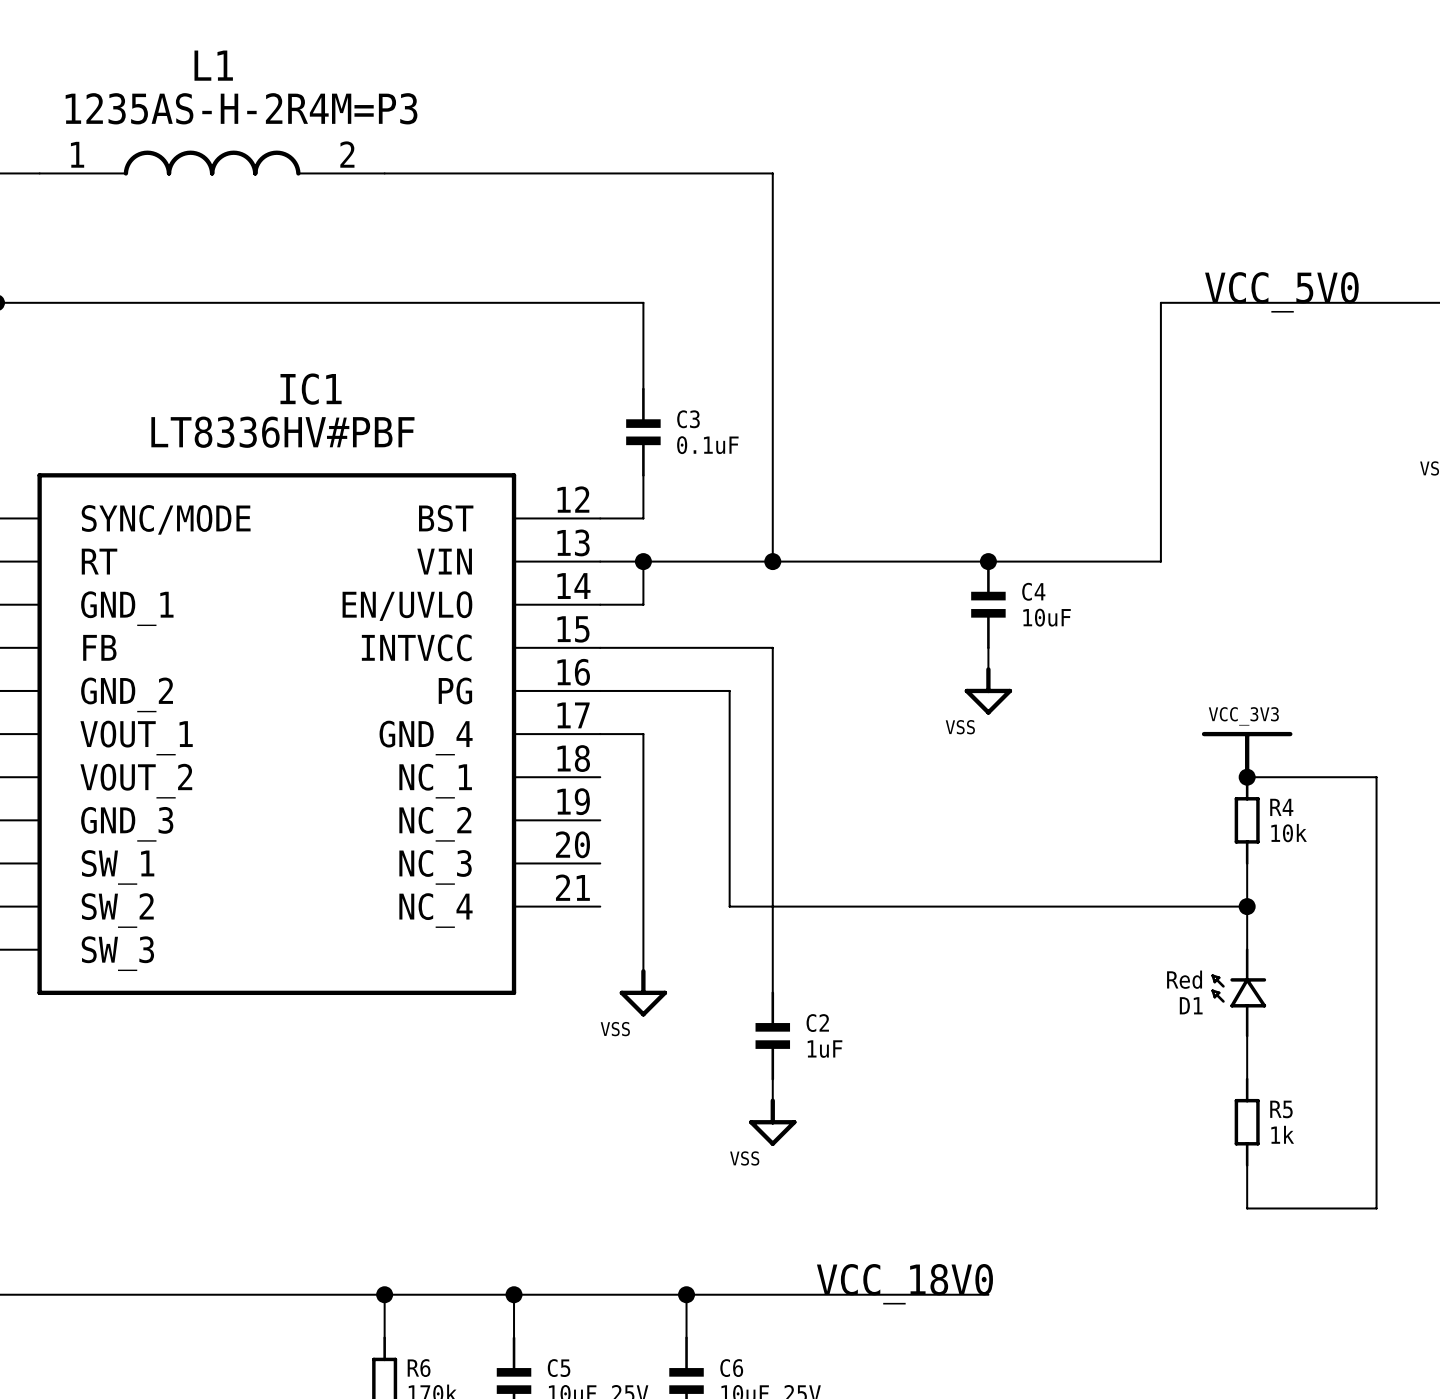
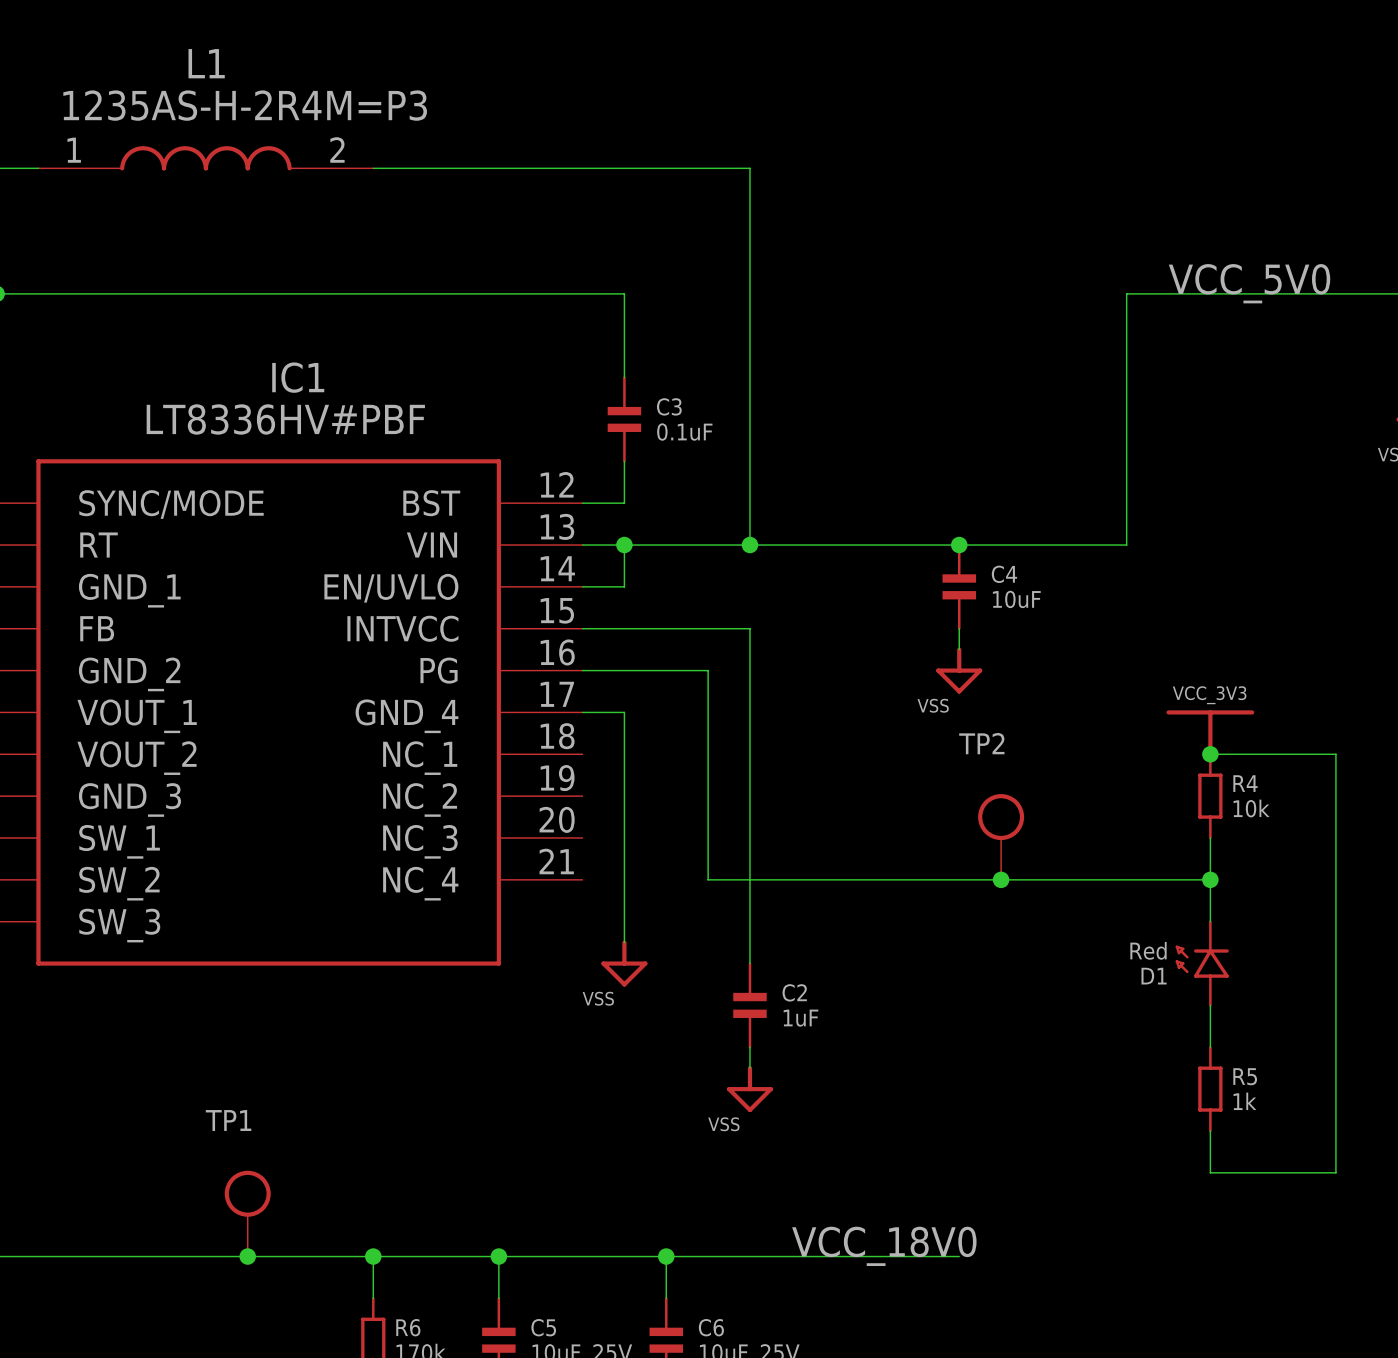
TP2: none -> (1001, 836)
junction: none -> (1001, 879)
TP1: none -> (247, 1213)
junction: none -> (247, 1256)

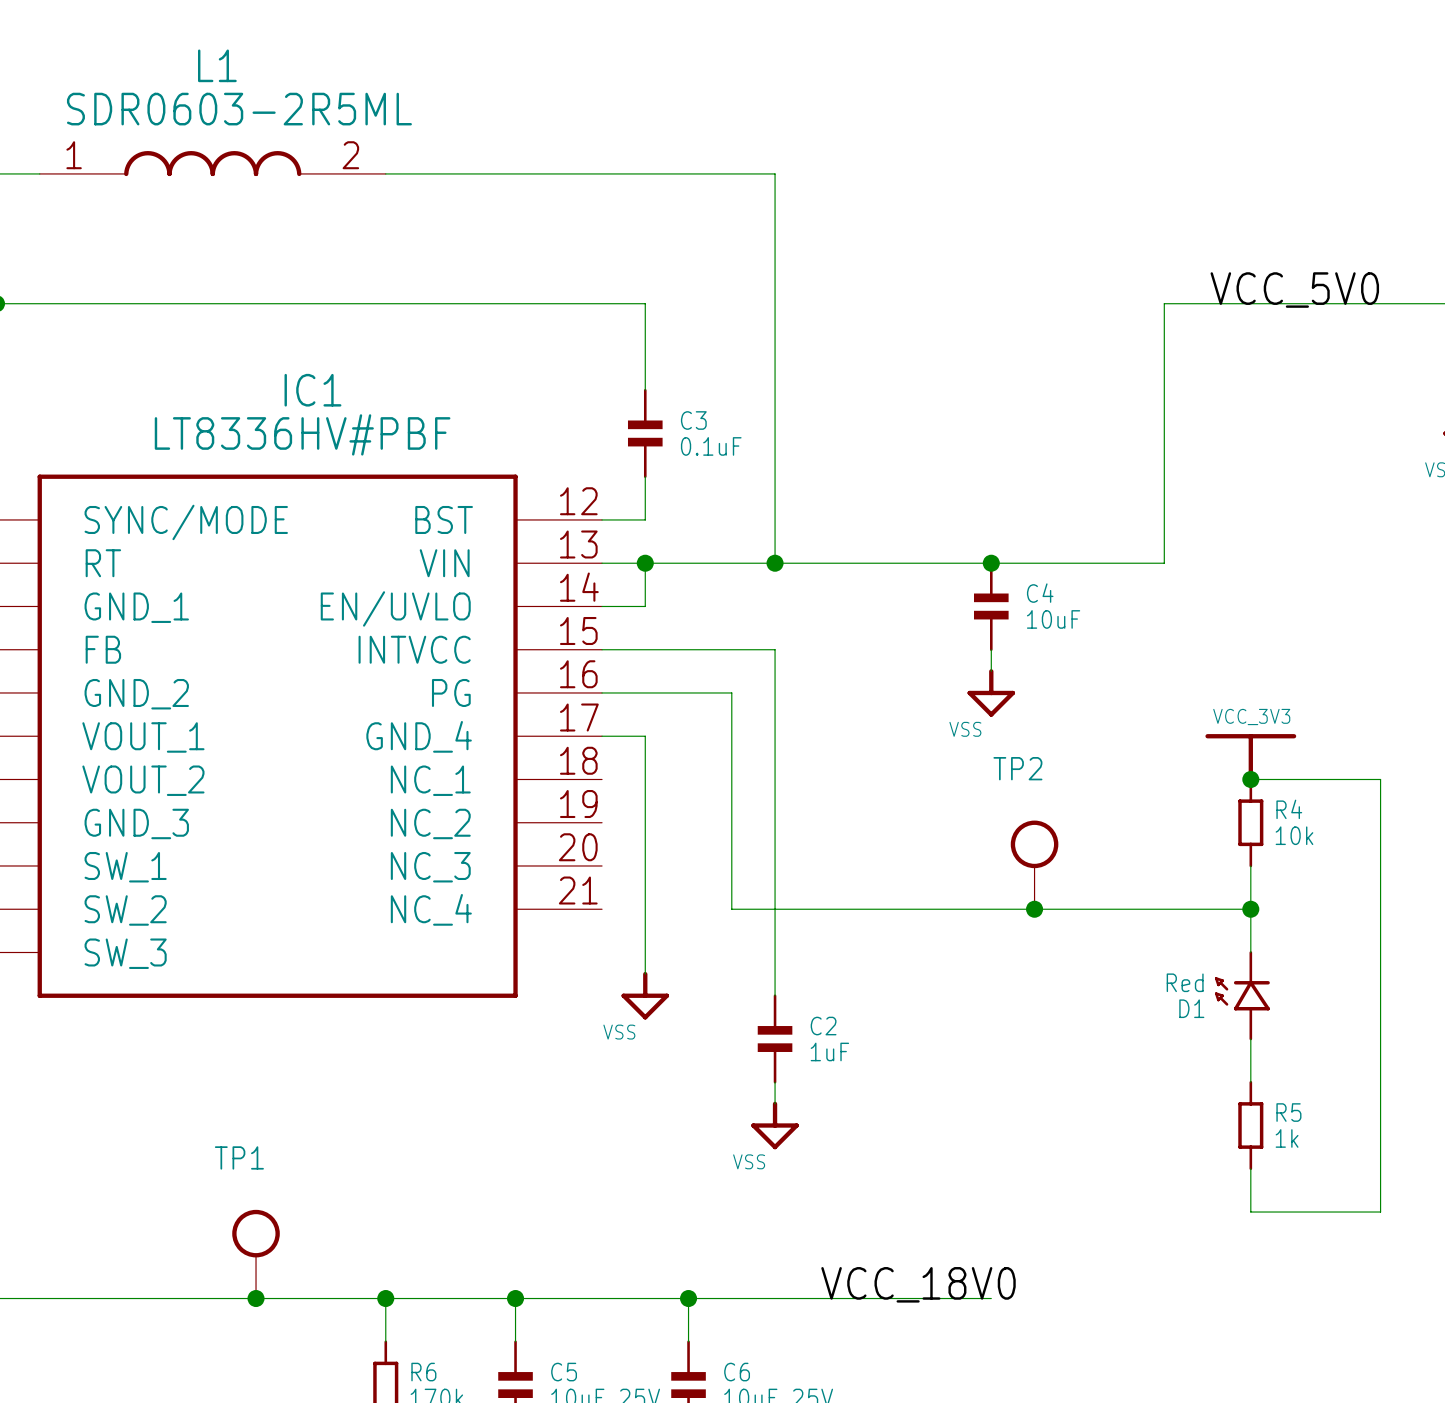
L1 value: 1235AS-H-2R4M=P3 (245, 105) -> SDR0603-2R5ML (239, 109)

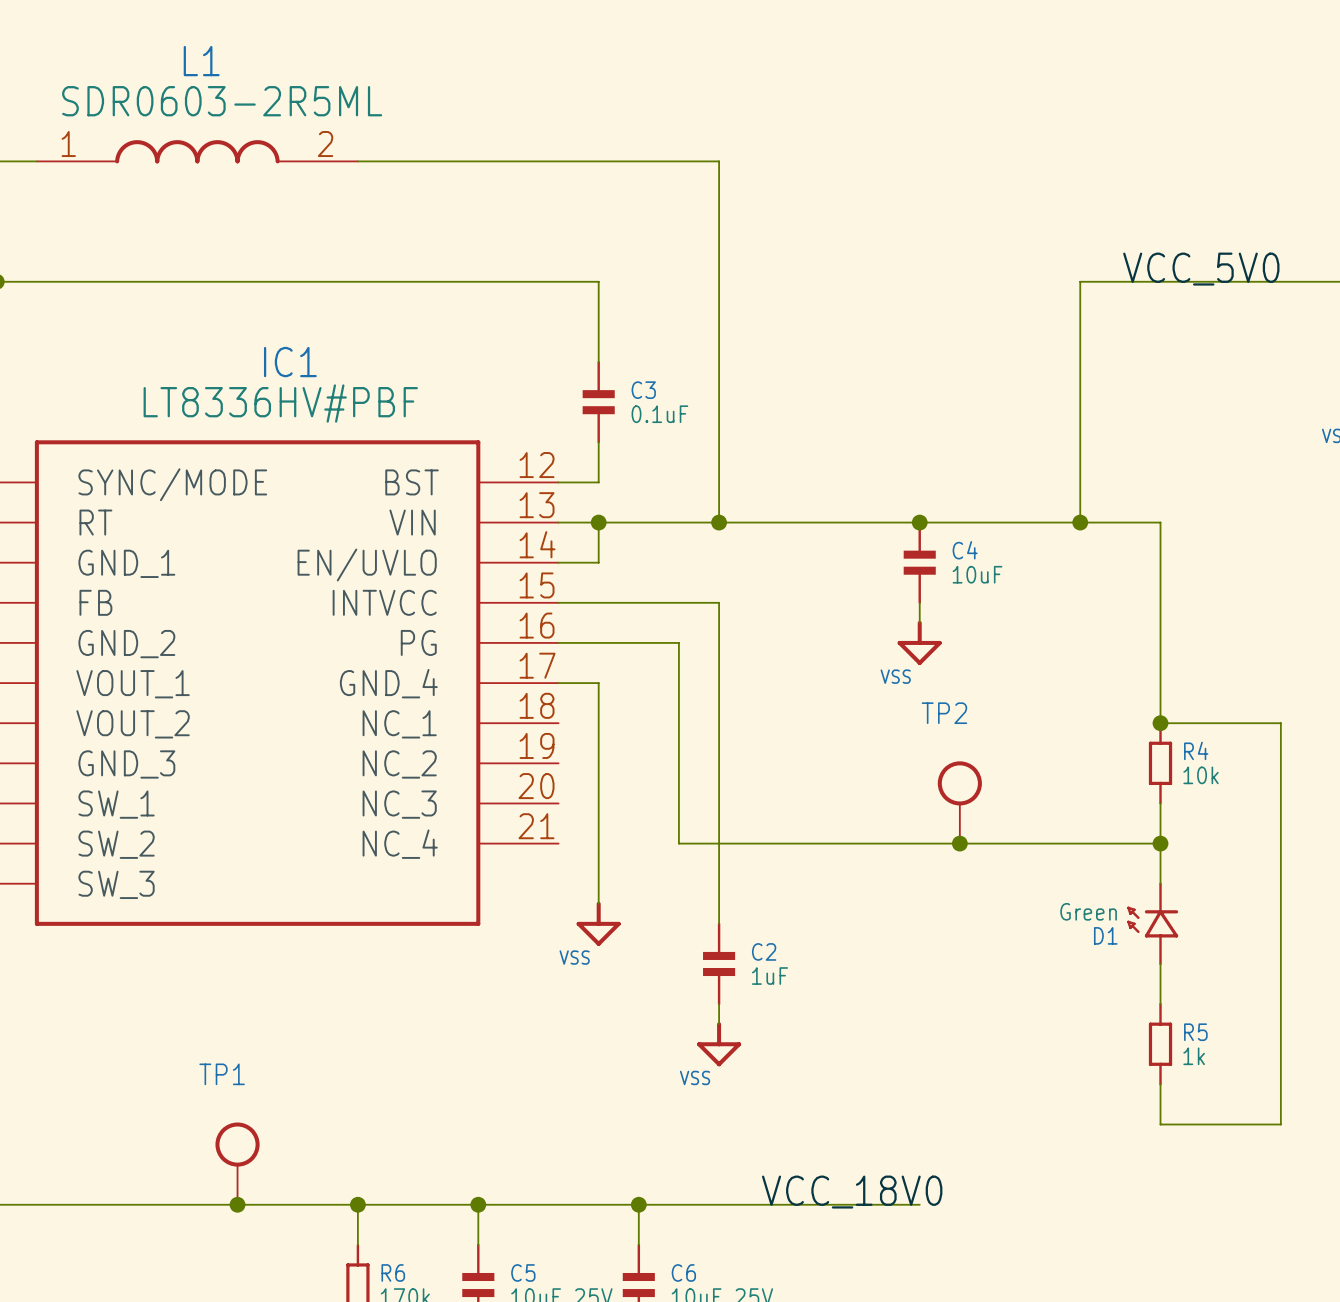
wire: none -> (1080, 522) (1160, 522) (1160, 723)
junction: none -> (1080, 522)
power symbol: VCC_3V3 (1250, 757) -> none
D1 value: Red (1185, 982) -> Green (1088, 911)

